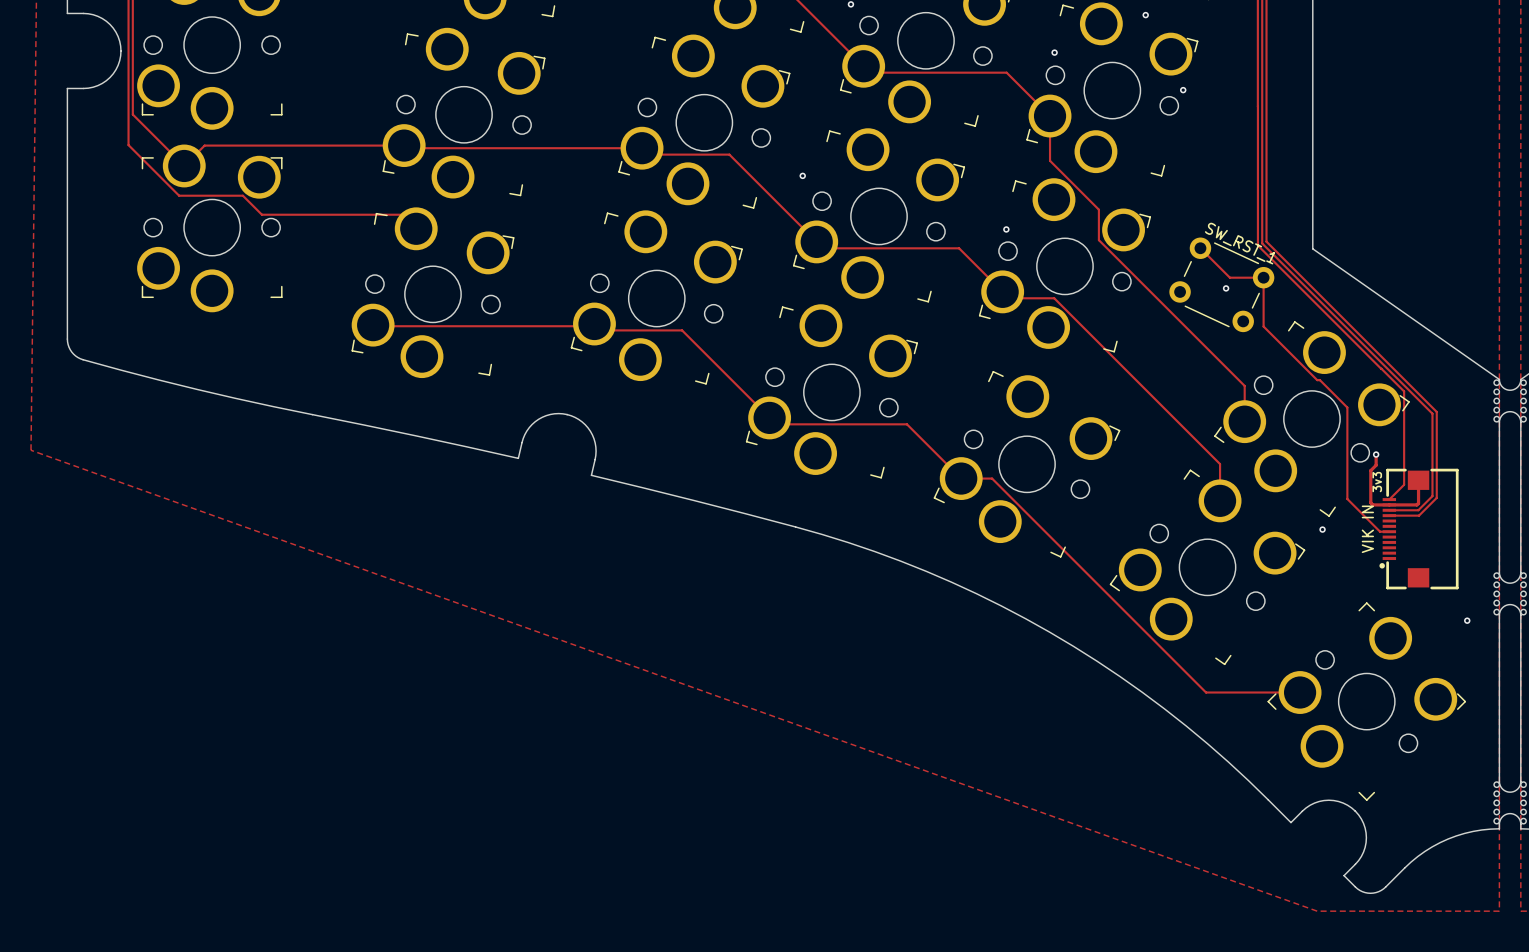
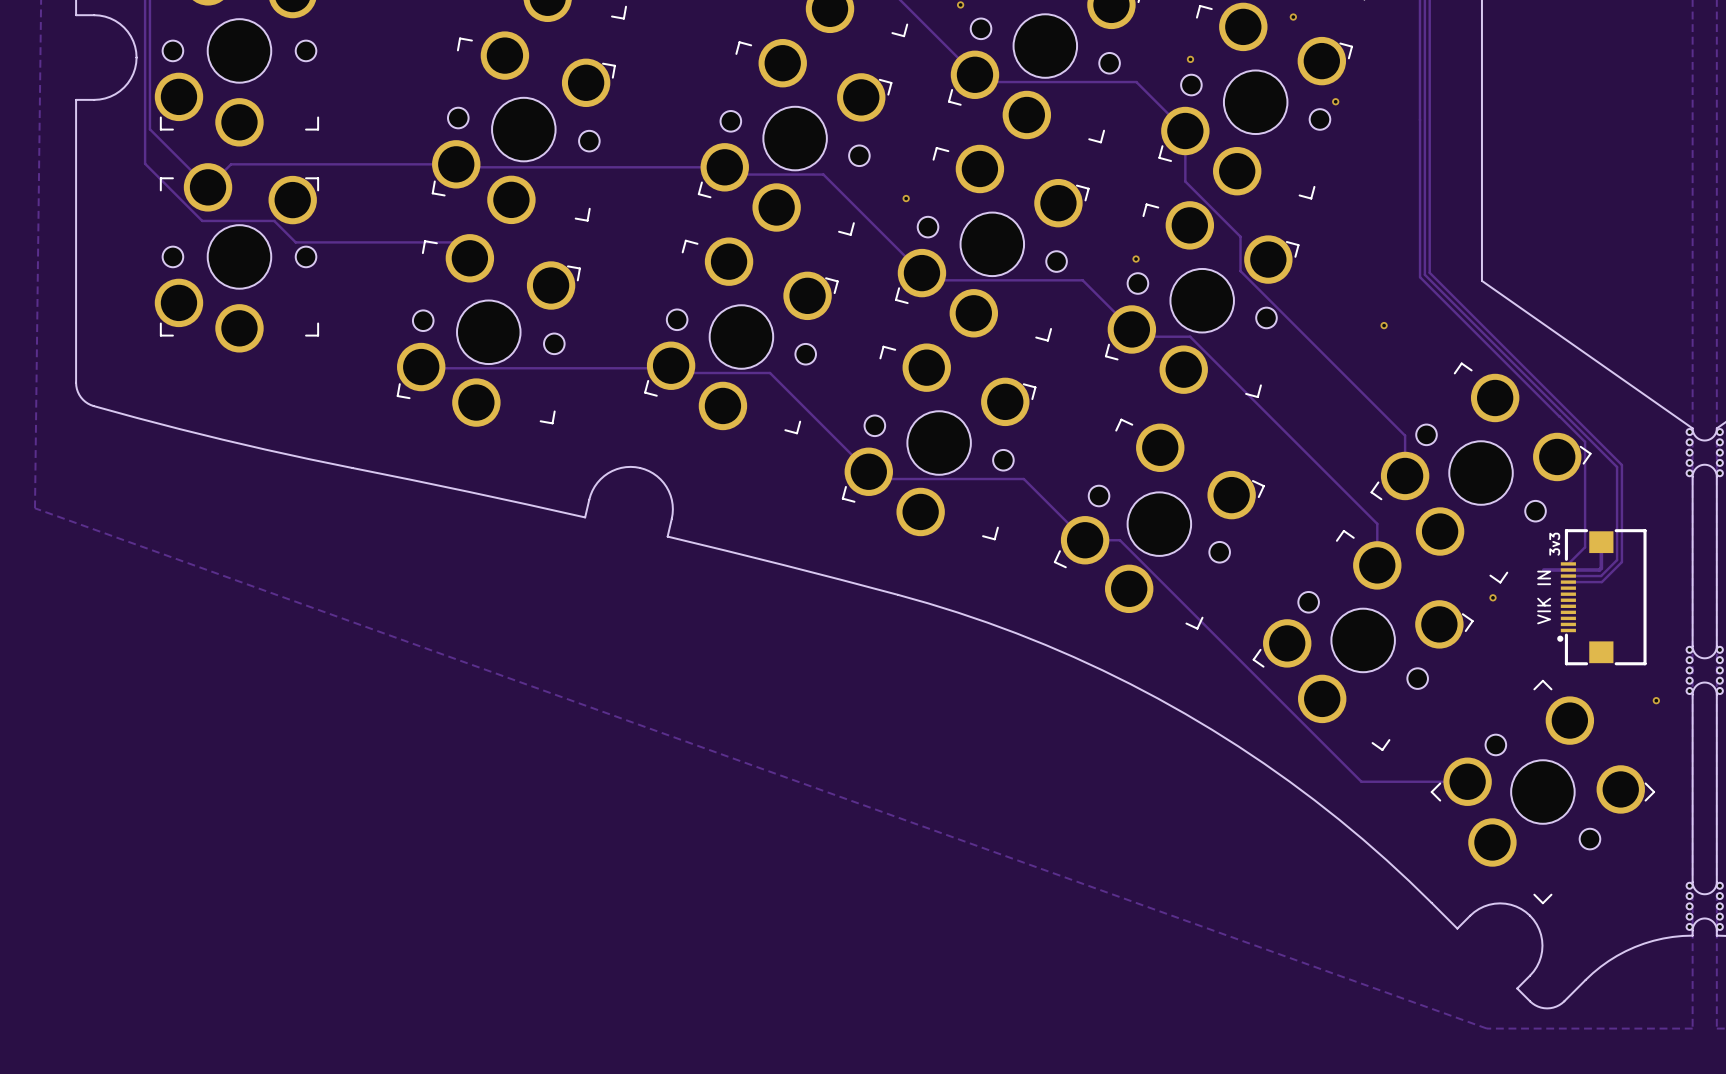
track: (1200, 248) (1229, 277) (1263, 277) (1263, 326) (1347, 407) (1347, 499) (1380, 531) (1389, 531) -> none
SW_RST_1: (1221, 284) -> none
track: (1376, 454) (1376, 465) (1370, 470) (1370, 502) (1372, 504) -> (1543, 569) (1549, 569)
via: (1376, 454) -> none

